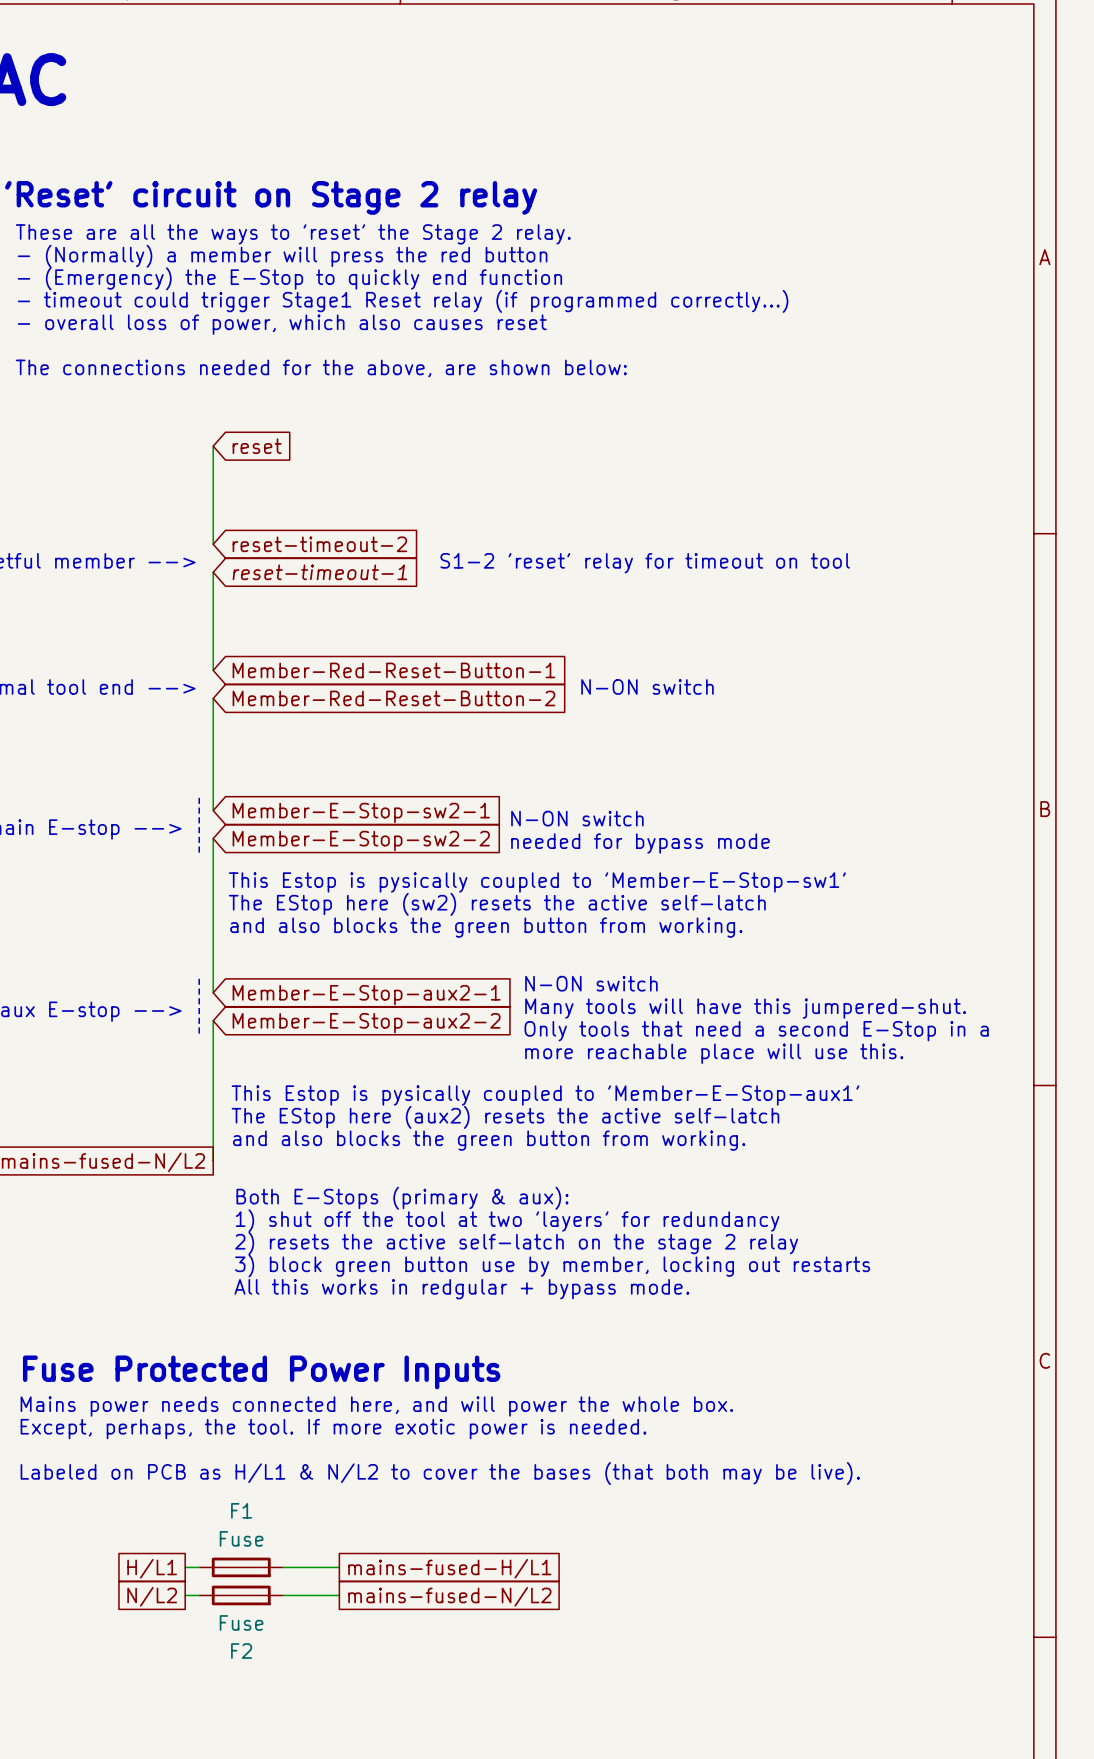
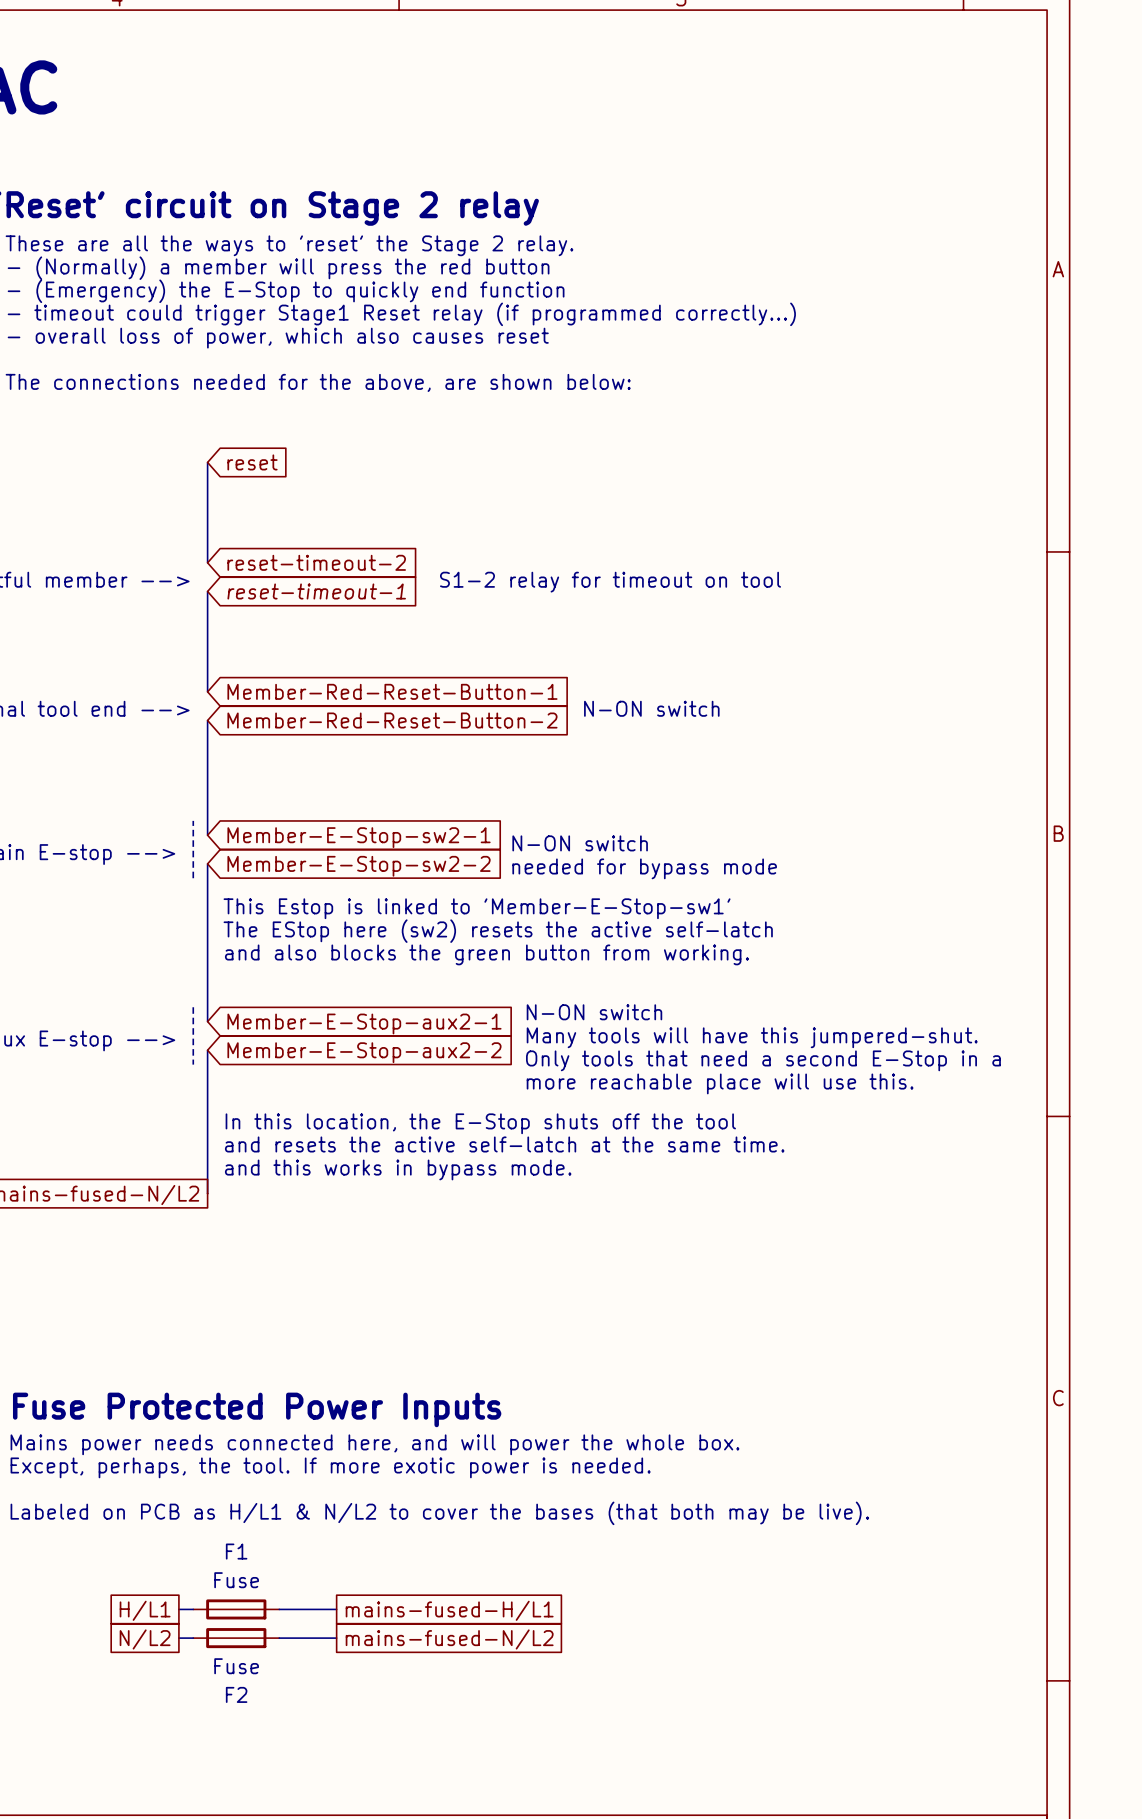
text: S1-2 'reset' relay for timeout on tool (645, 563) -> S1-2 relay for timeout on tool (610, 582)
text: This Estop is pysically coupled to 'Member-E-Stop-sw1' (537, 882) -> This Estop is linked to 'Member-E-Stop-sw1' (477, 908)
text: This Estop is pysically coupled to 'Member-E-Stop-aux1' (545, 1095) -> In this location, the E-Stop shuts off the tool (480, 1123)
text: The EStop here (aux2) resets the active self-latch (505, 1117) -> and resets the active self-latch at the same time. (504, 1144)
text: and also blocks the green button from working. (489, 1140) -> and this works in bypass mode. (398, 1169)
text: Both E-Stops (primary & aux): (402, 1198) -> none
text: 1) shut off the tool at two 'layers' for redundancy (507, 1220) -> none
text: 2) resets the active self-latch on the stage 2 relay (516, 1243) -> none
text: 3) block green button use by member, locking out restarts (552, 1265) -> none
text: All this works in redgular + bypass mode. (461, 1289) -> none

